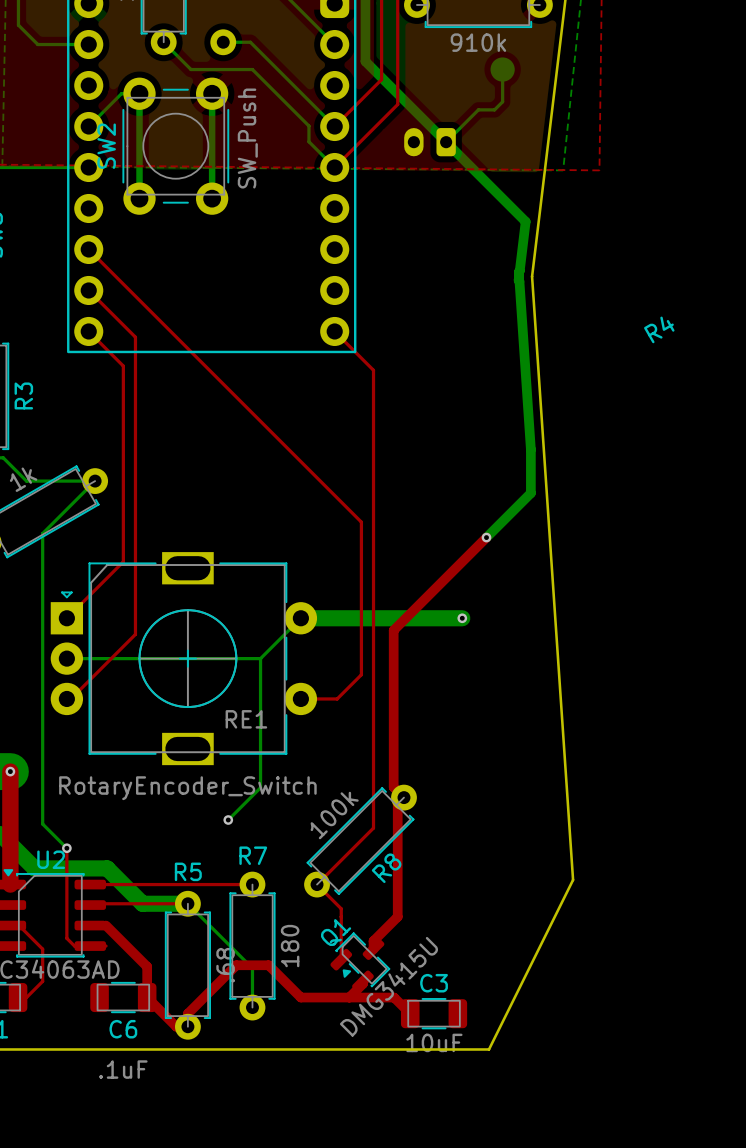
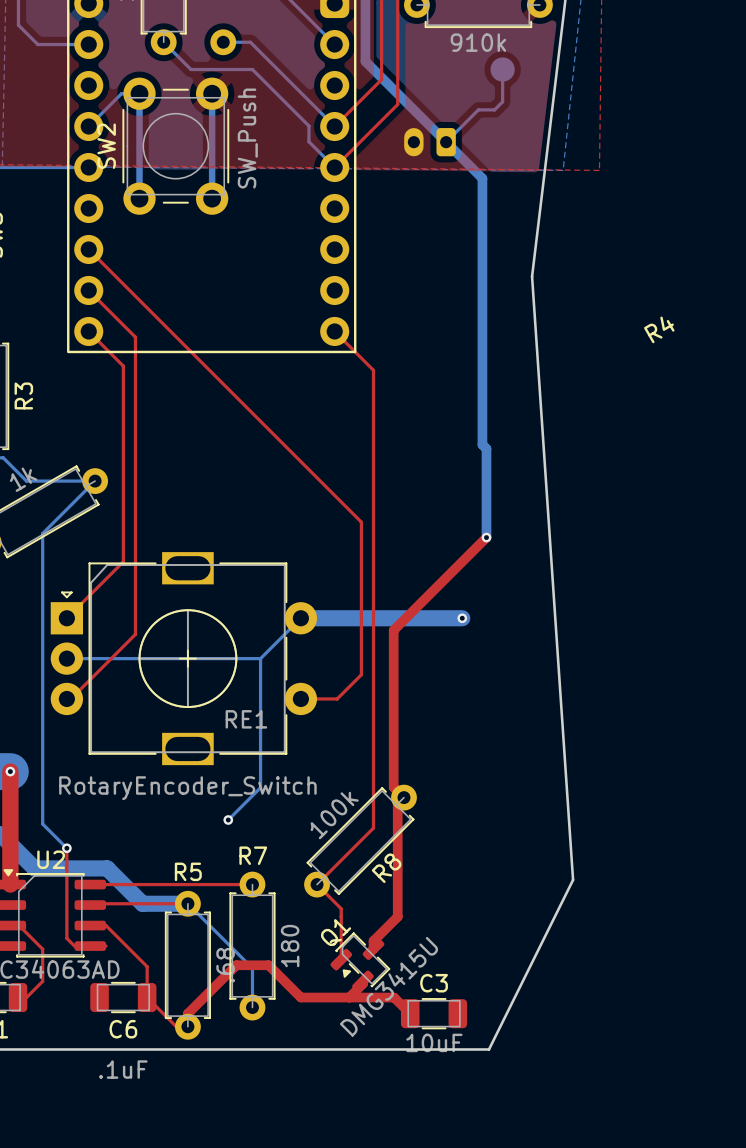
bottom track: (482, 178) (525, 221) (518, 280) (530, 449) (530, 493) (486, 537) -> (482, 178) (482, 444) (486, 448) (486, 537)
top track width: thick (106, 925) (147, 966) (147, 997) (176, 1026) (187, 1026) -> thin (106, 925) (147, 966) (147, 997) (176, 1026) (187, 1026)

